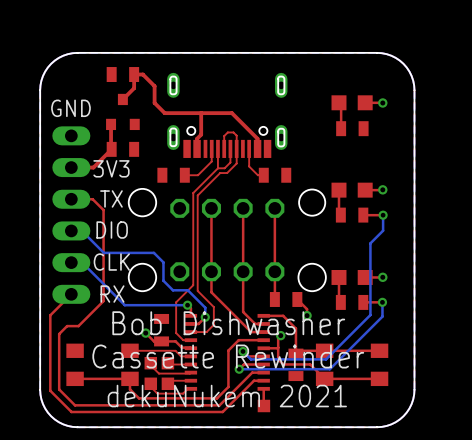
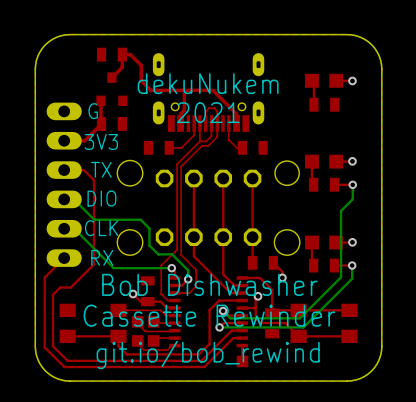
text: none -> dekuNukem (208, 83)
text: GND (70, 108) -> none
text: none -> G (93, 111)
text: none -> 2021 (208, 112)
text: dekuNukem 2021 (227, 396) -> git.io/bob_rewind (208, 354)

